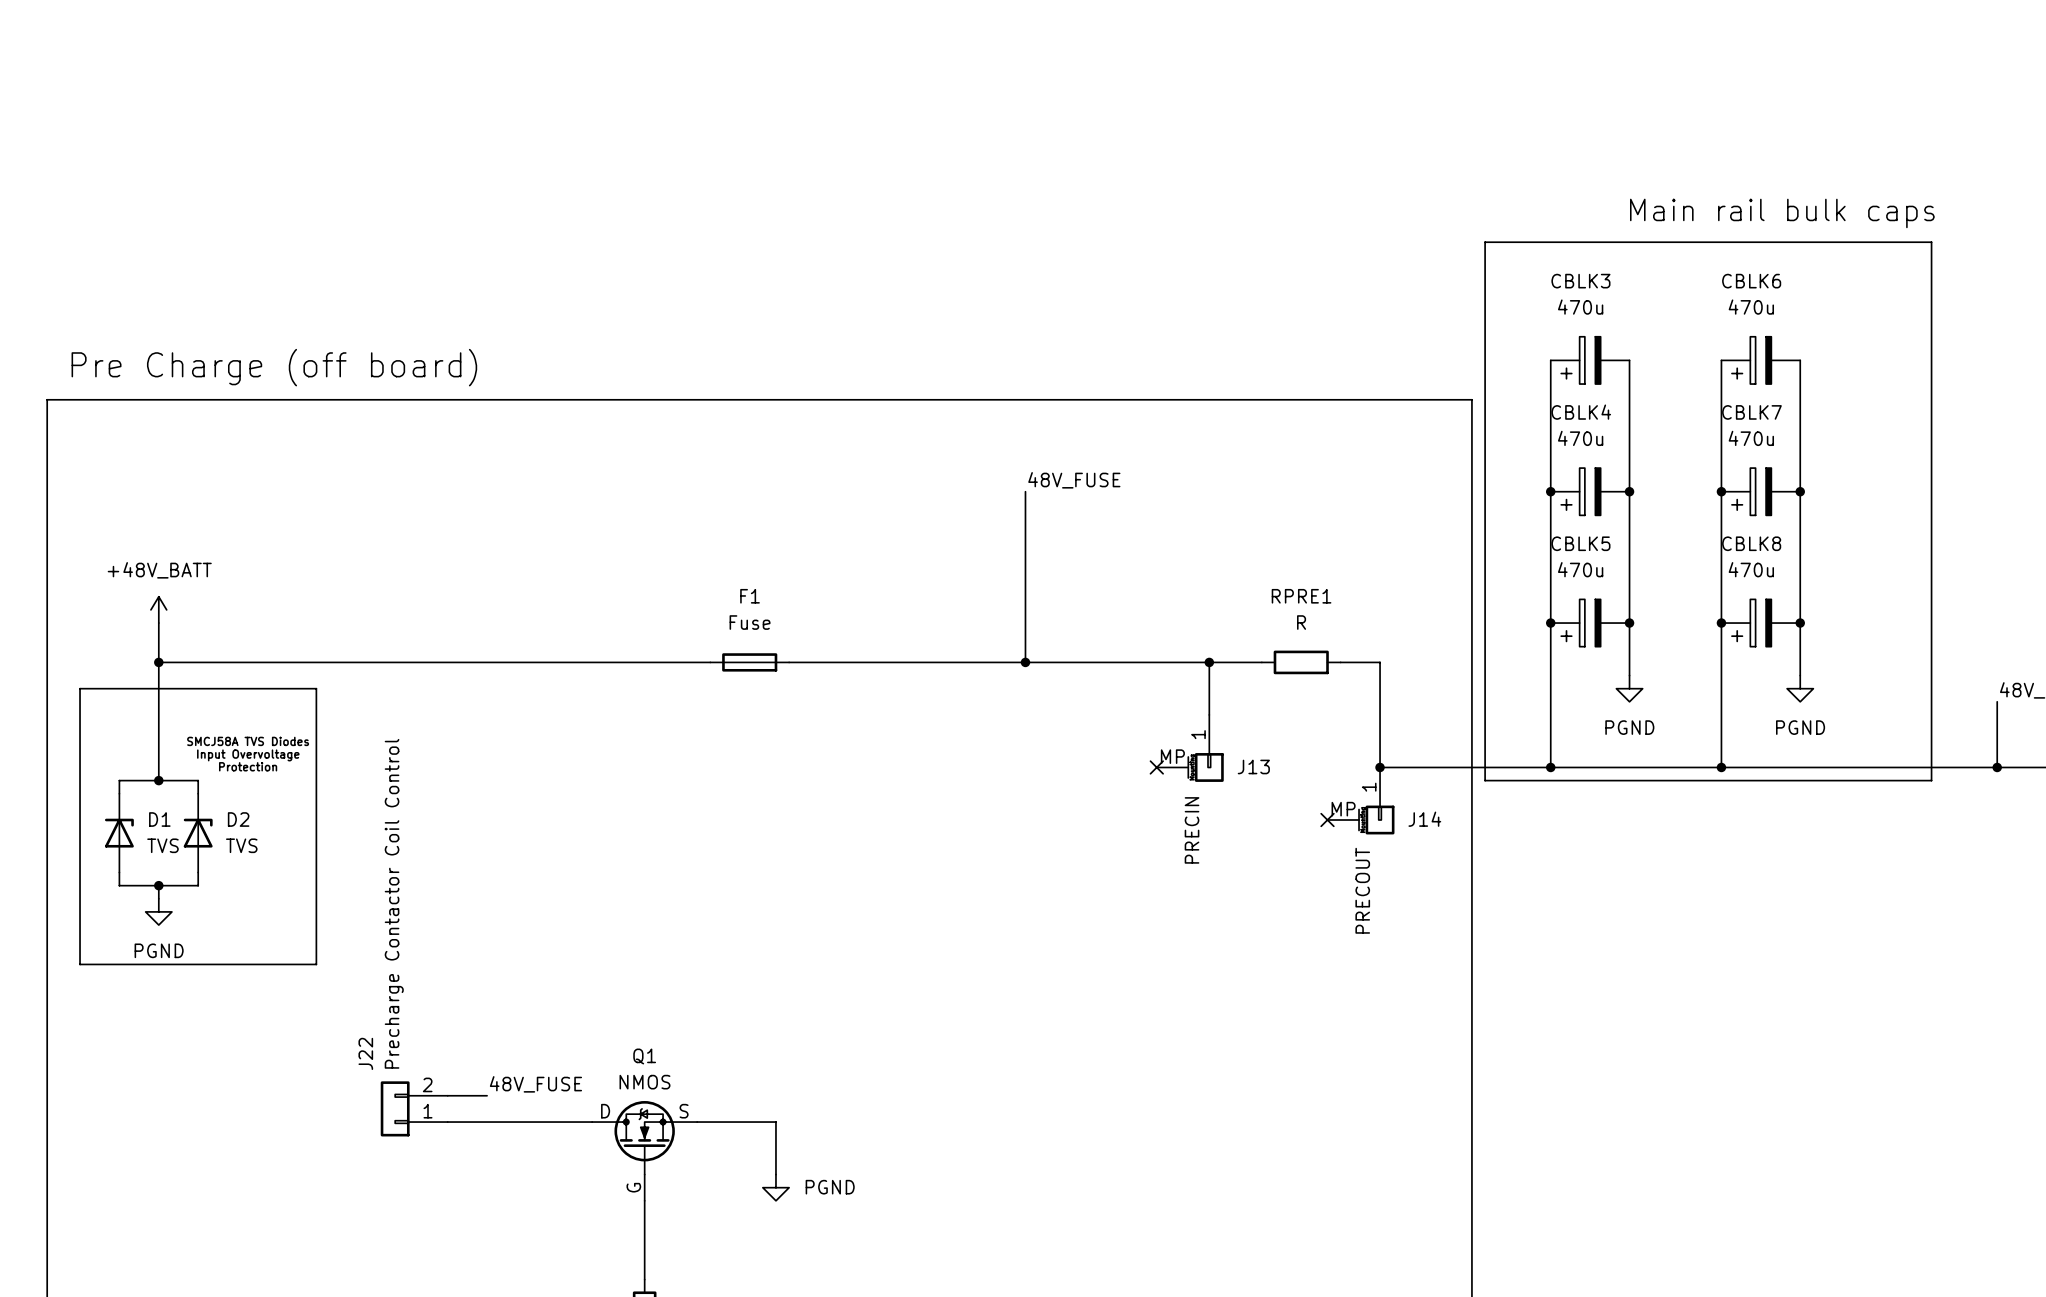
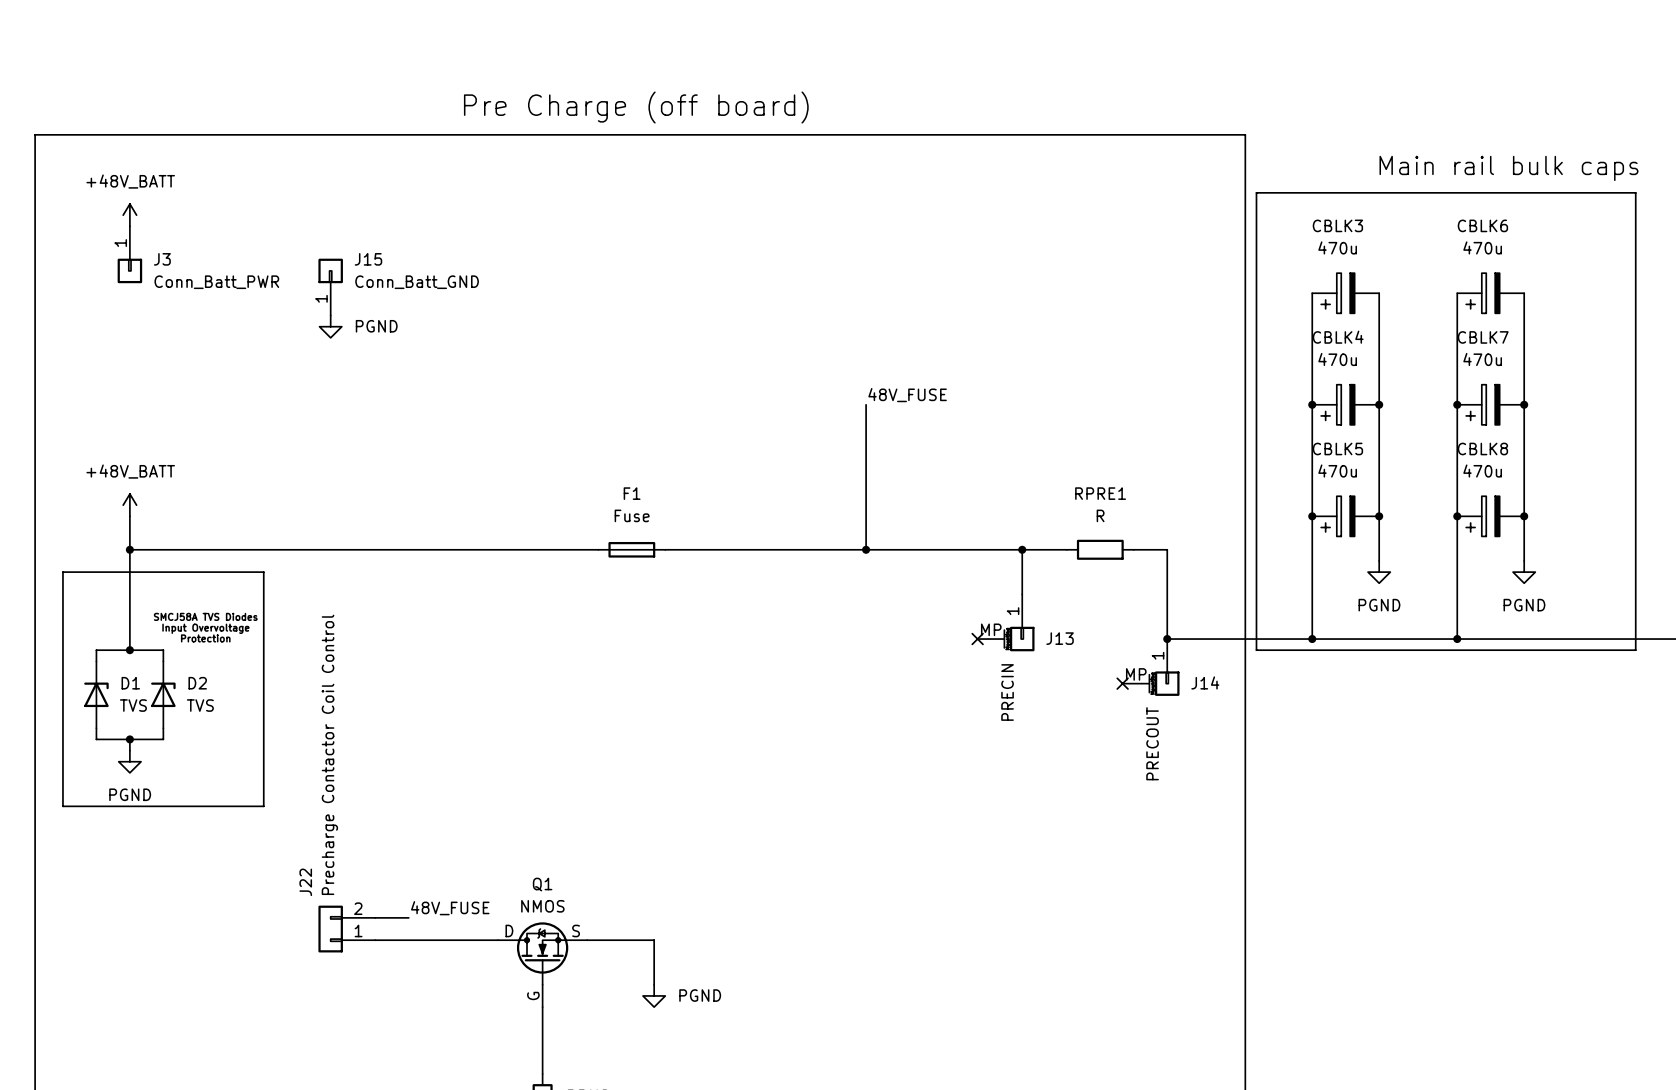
text: none -> Pre Charge (off board) (636, 107)
power symbol: none -> +48V_BATT (129, 215)
J3: none -> Conn_Batt_PWR (129, 254)
J15: none -> Conn_Batt_GND (330, 287)
text: Pre Charge (off board) (274, 367) -> none
line: (47, 399) (1471, 399) -> (35, 326) (35, 134) (1245, 134) (1245, 326)
power symbol: none -> PGND (330, 326)

